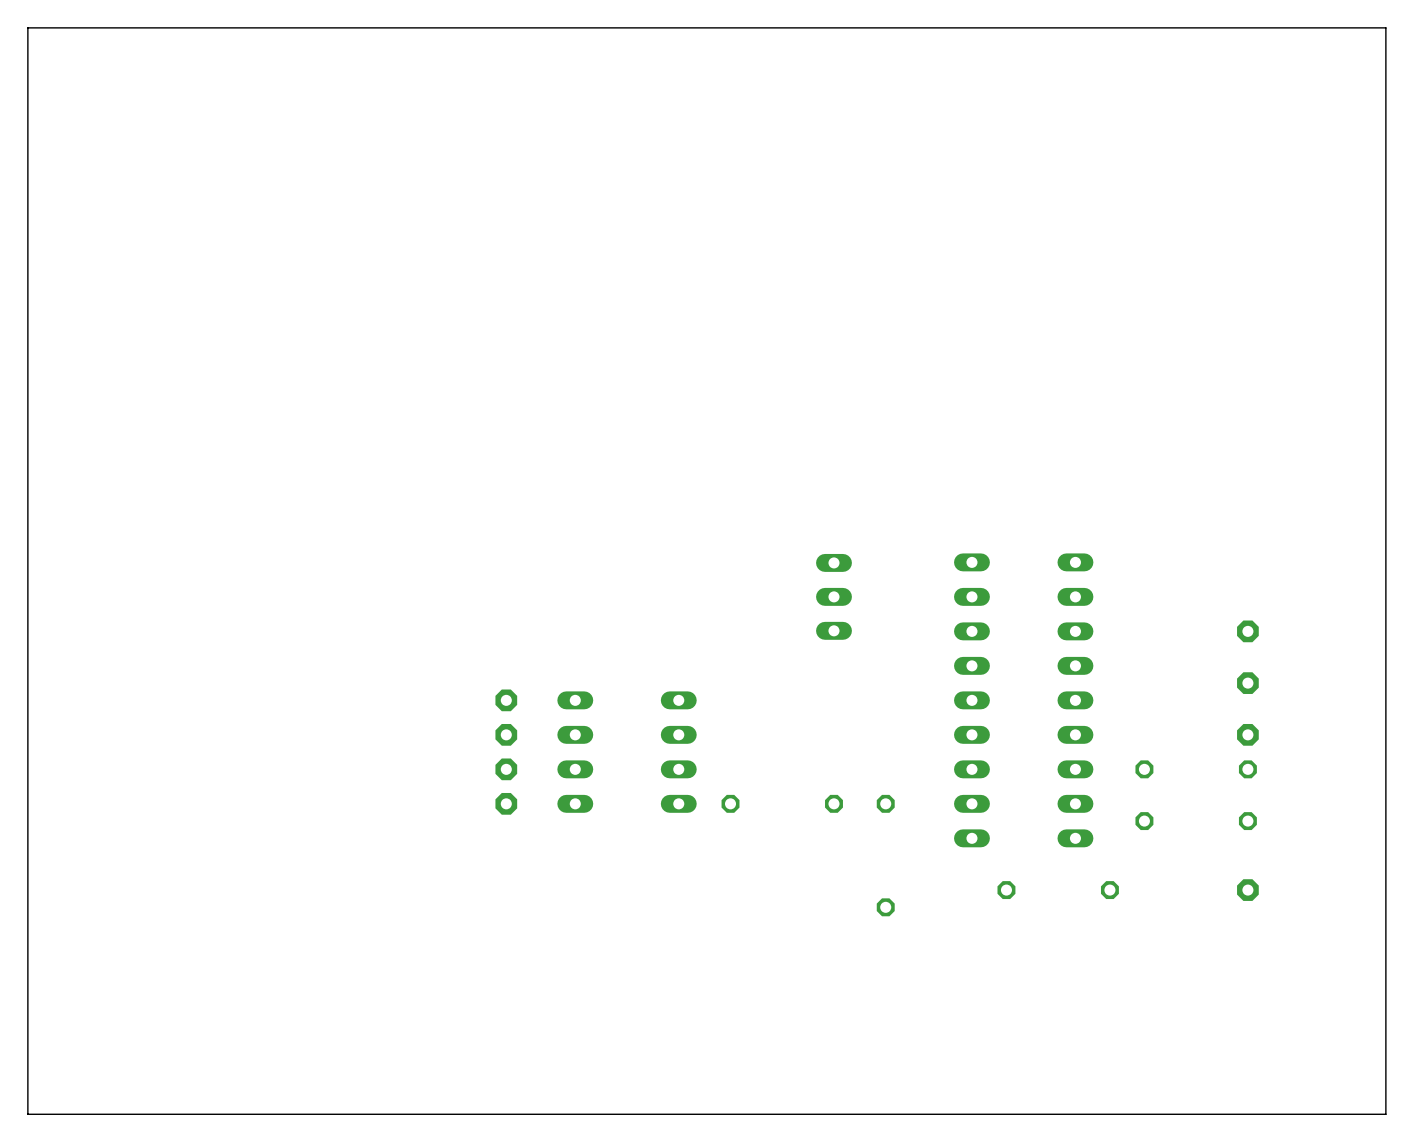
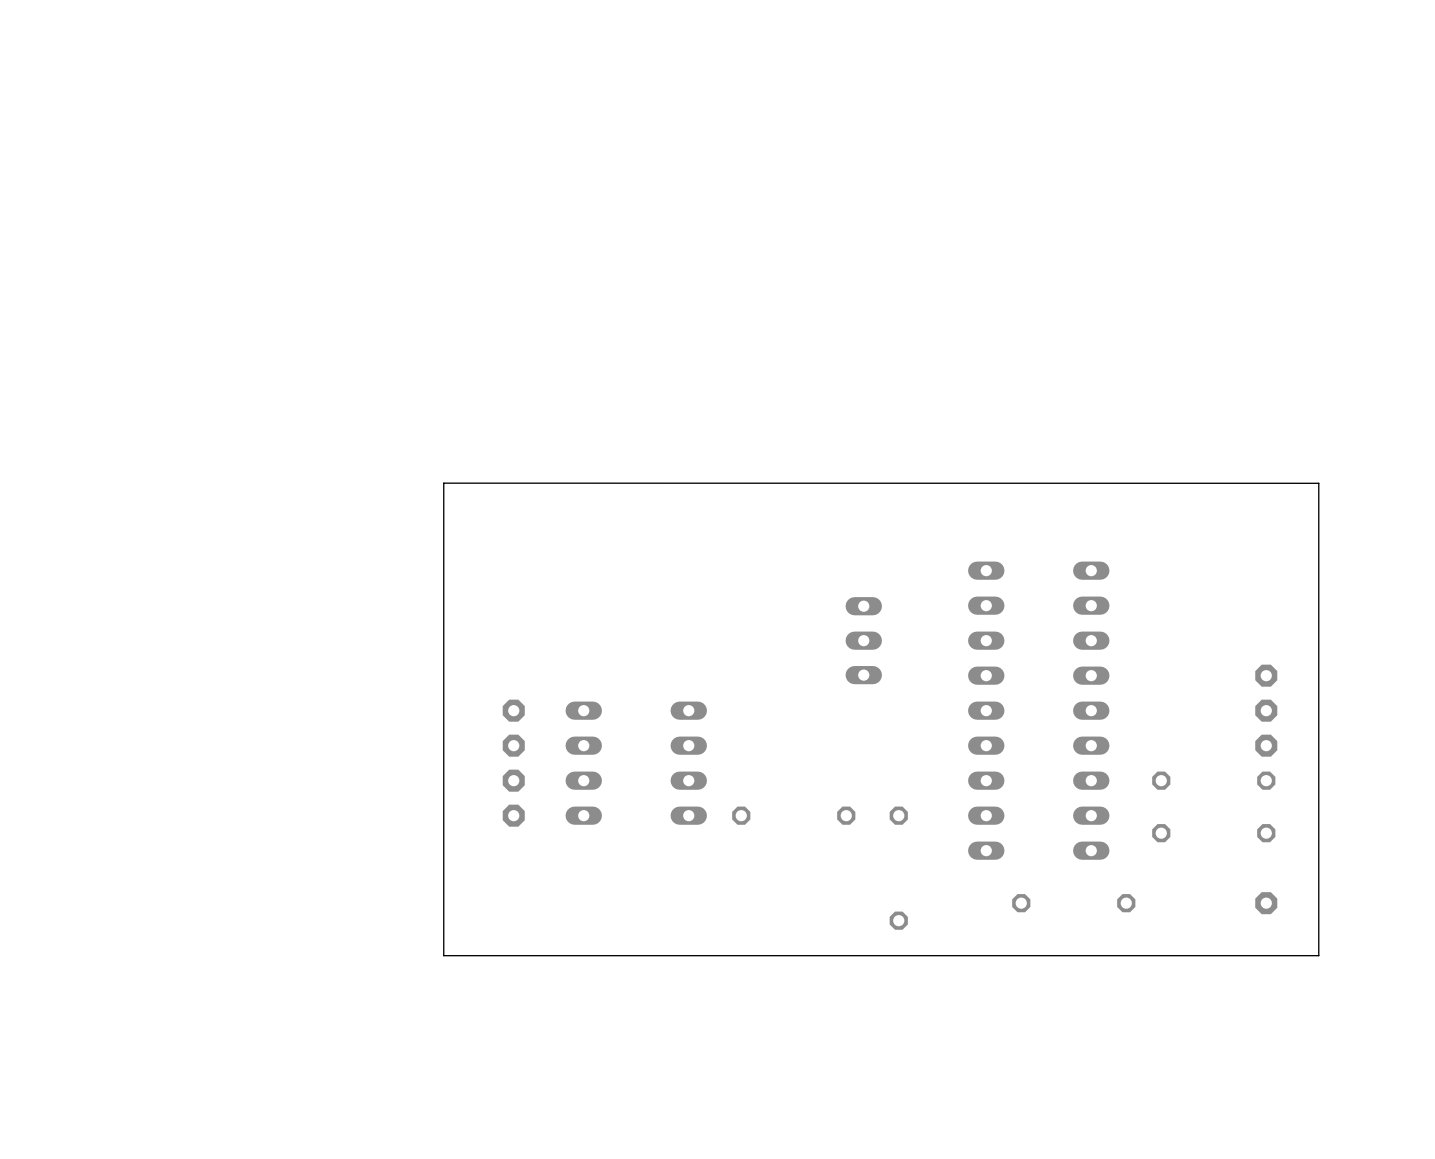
board edge: (1385, 27) (27, 27) (27, 1114) (1385, 1114) (1385, 27) -> none
board edge: none -> (443, 483) (443, 955) (1318, 955) (1318, 483) (443, 483)
part position: (833, 596) -> (863, 640)
part: (1247, 631) -> none
part: none -> (1266, 675)
part: (1247, 683) -> none
part: none -> (1266, 710)

